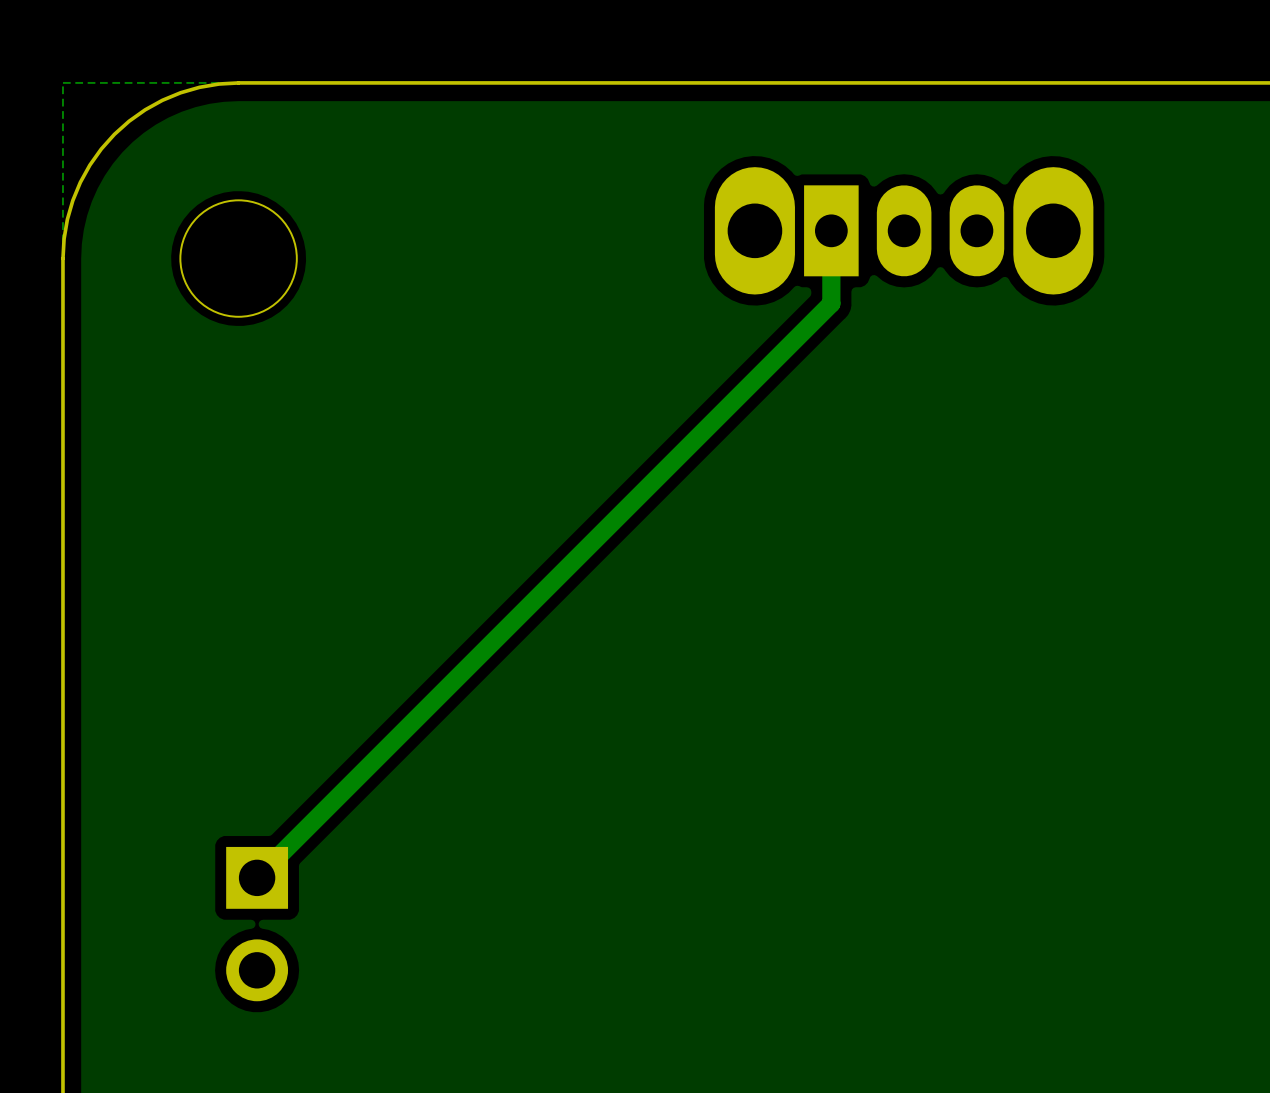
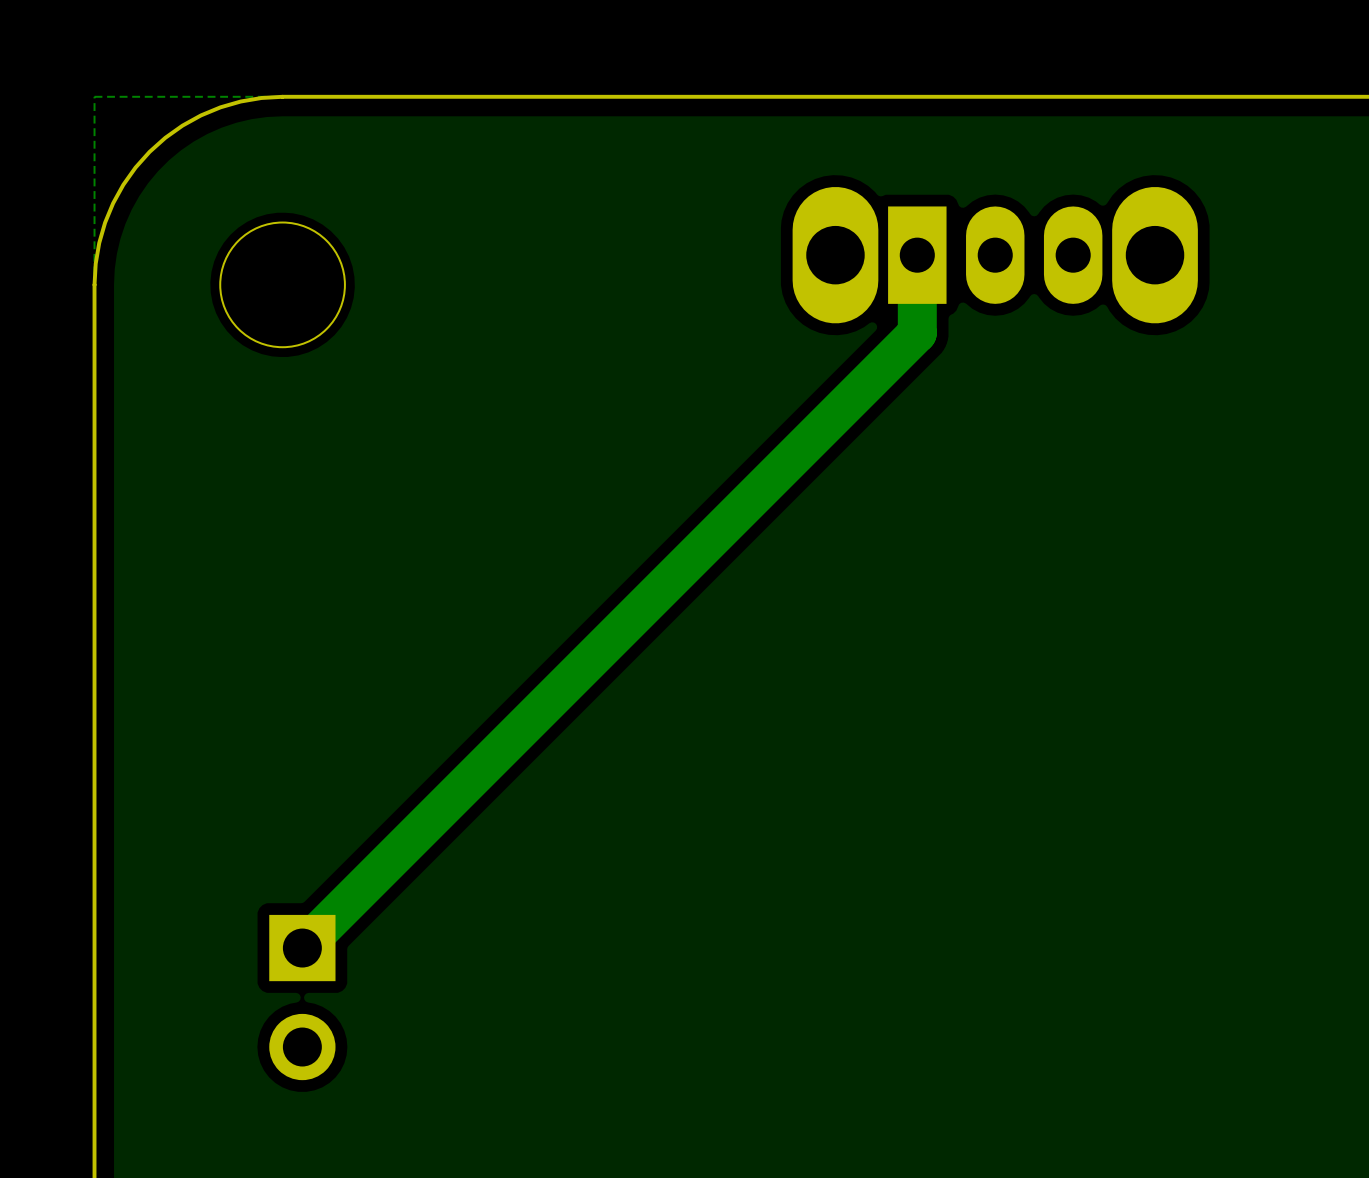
track width: thin (831, 230) (831, 303) (257, 877) -> thick (917, 255) (917, 333) (302, 948)

